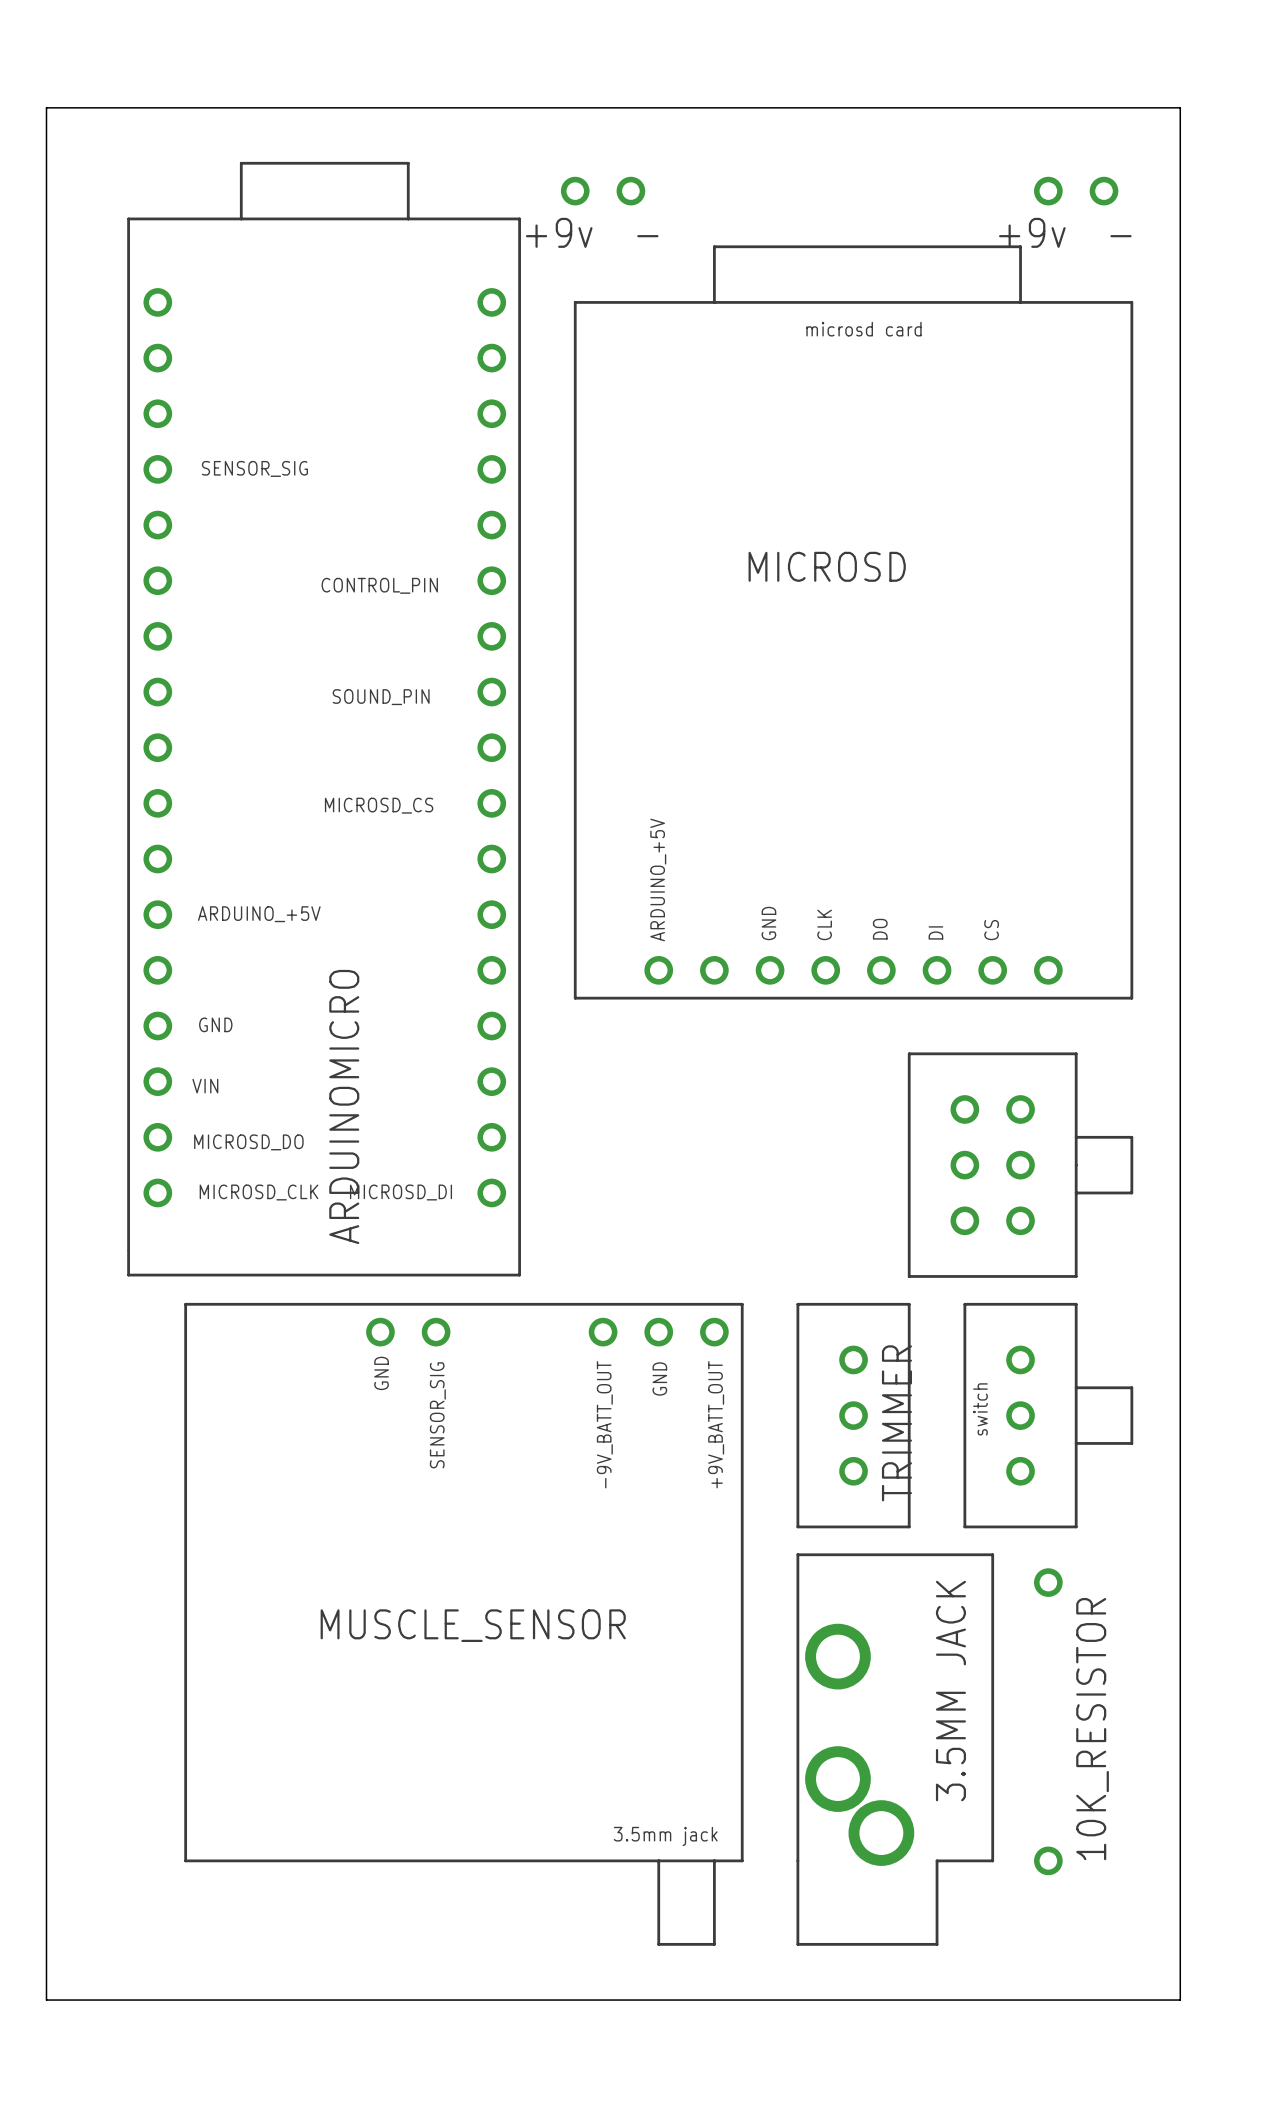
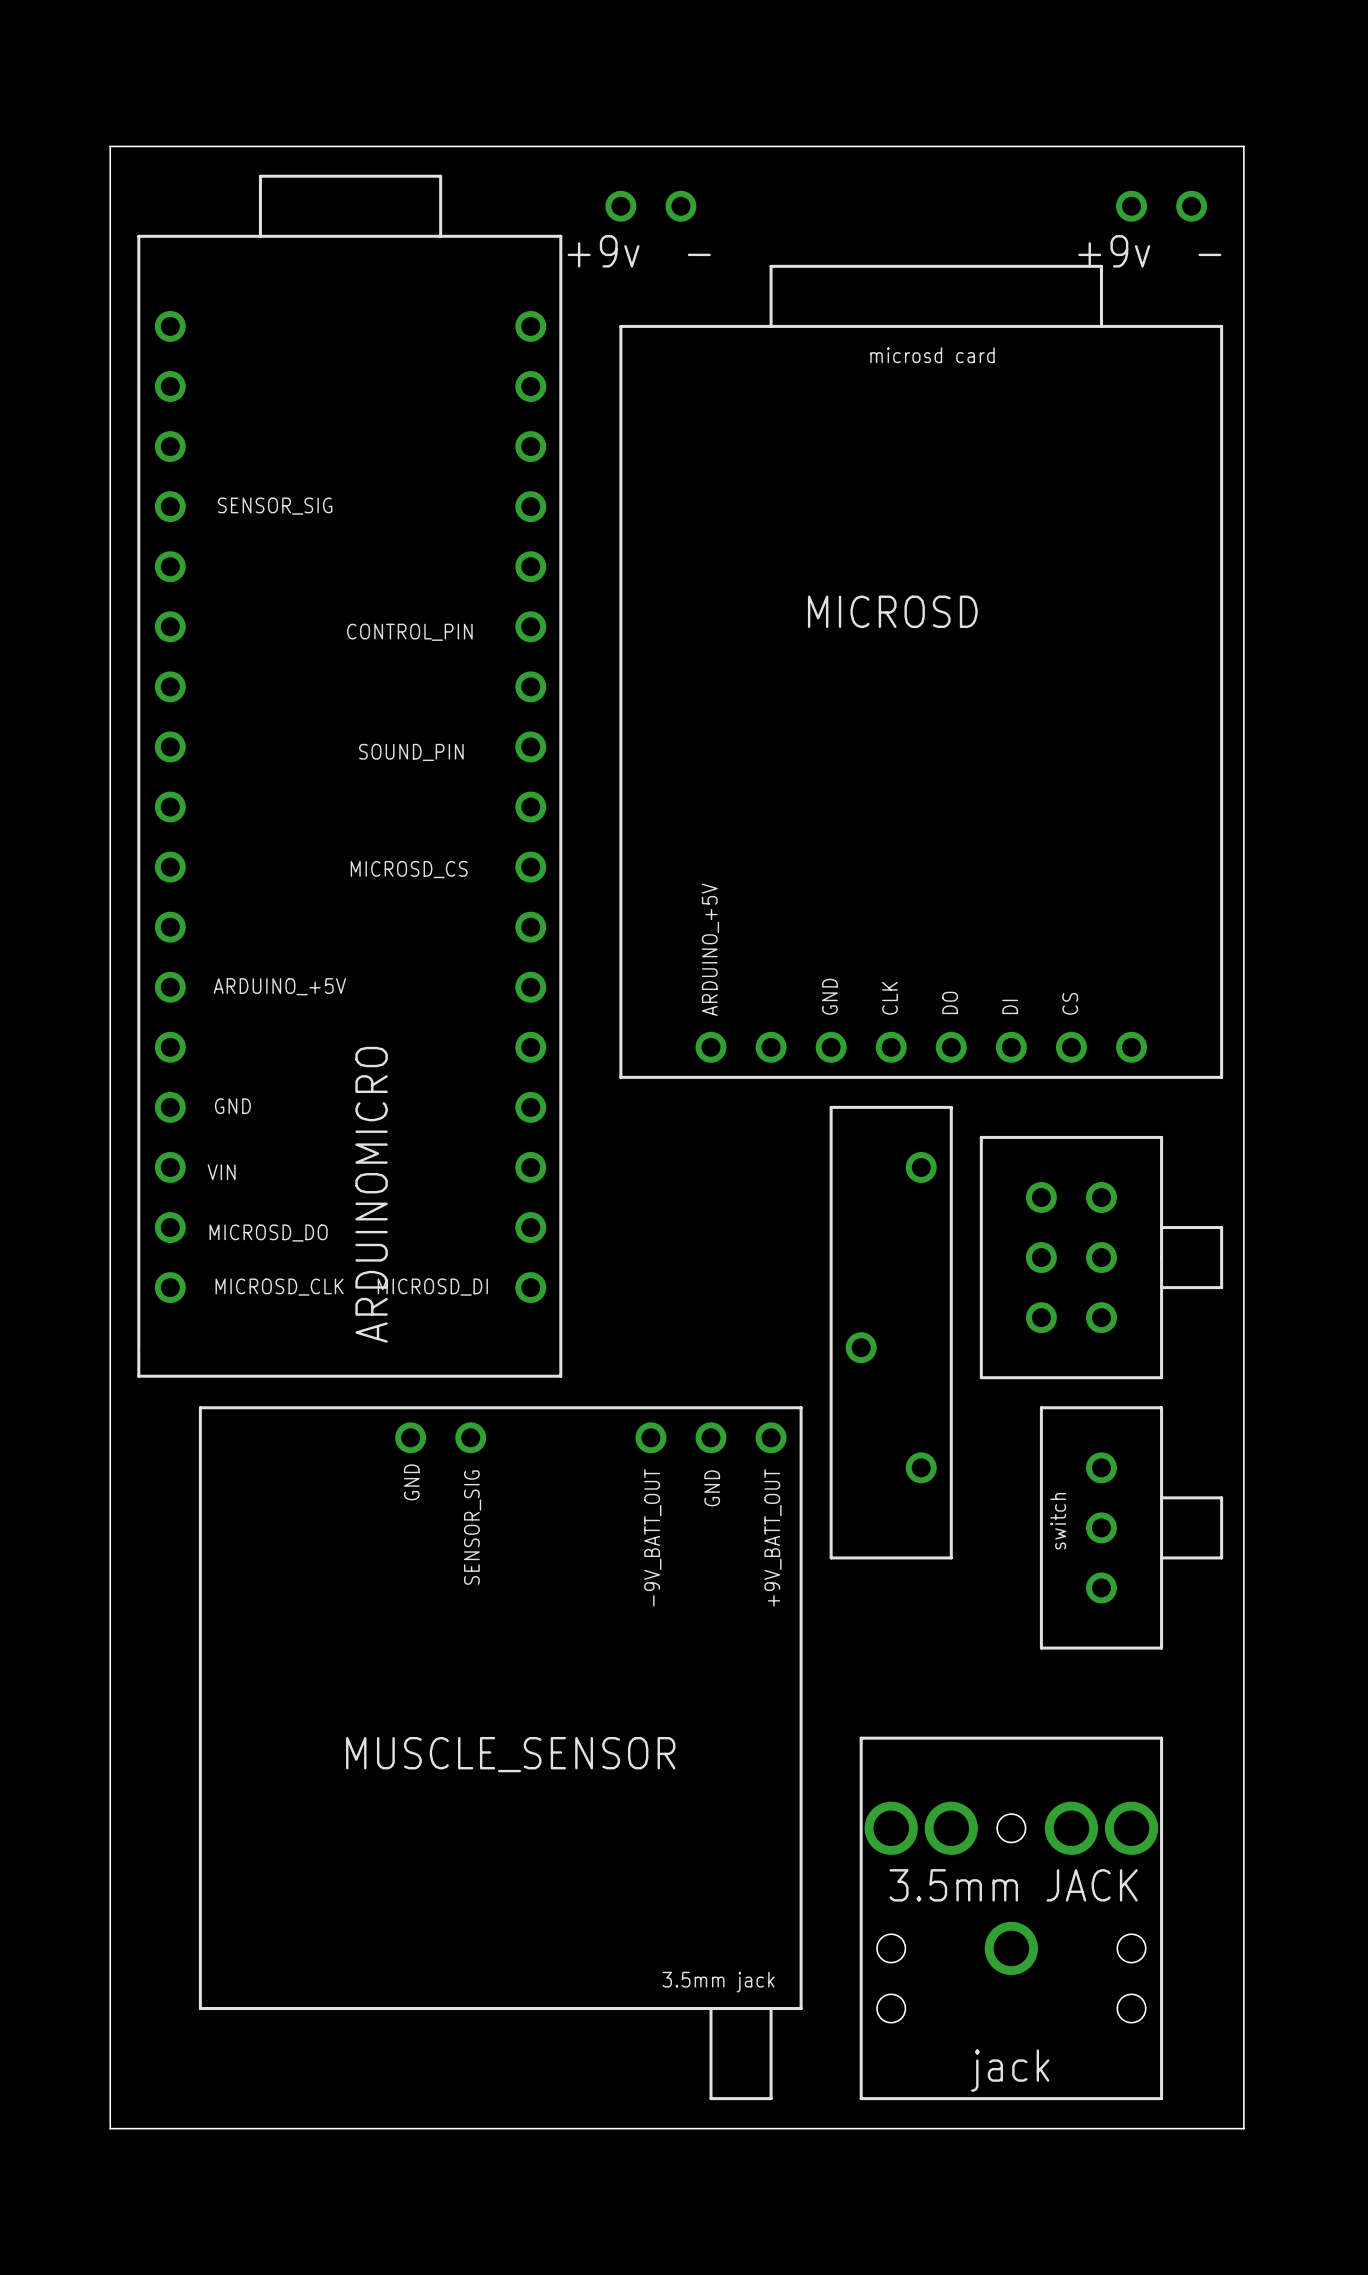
board edge: (46, 107) (1180, 107) (1180, 2000) (46, 2000) (46, 107) -> (110, 146) (110, 2128) (1243, 2128) (1243, 146) (110, 146)
part: none -> (891, 1332)
TRIMMER: (853, 1415) -> none
10K_RESISTOR: (1048, 1721) -> none
part: (895, 1749) -> none
part: none -> (1011, 1918)

